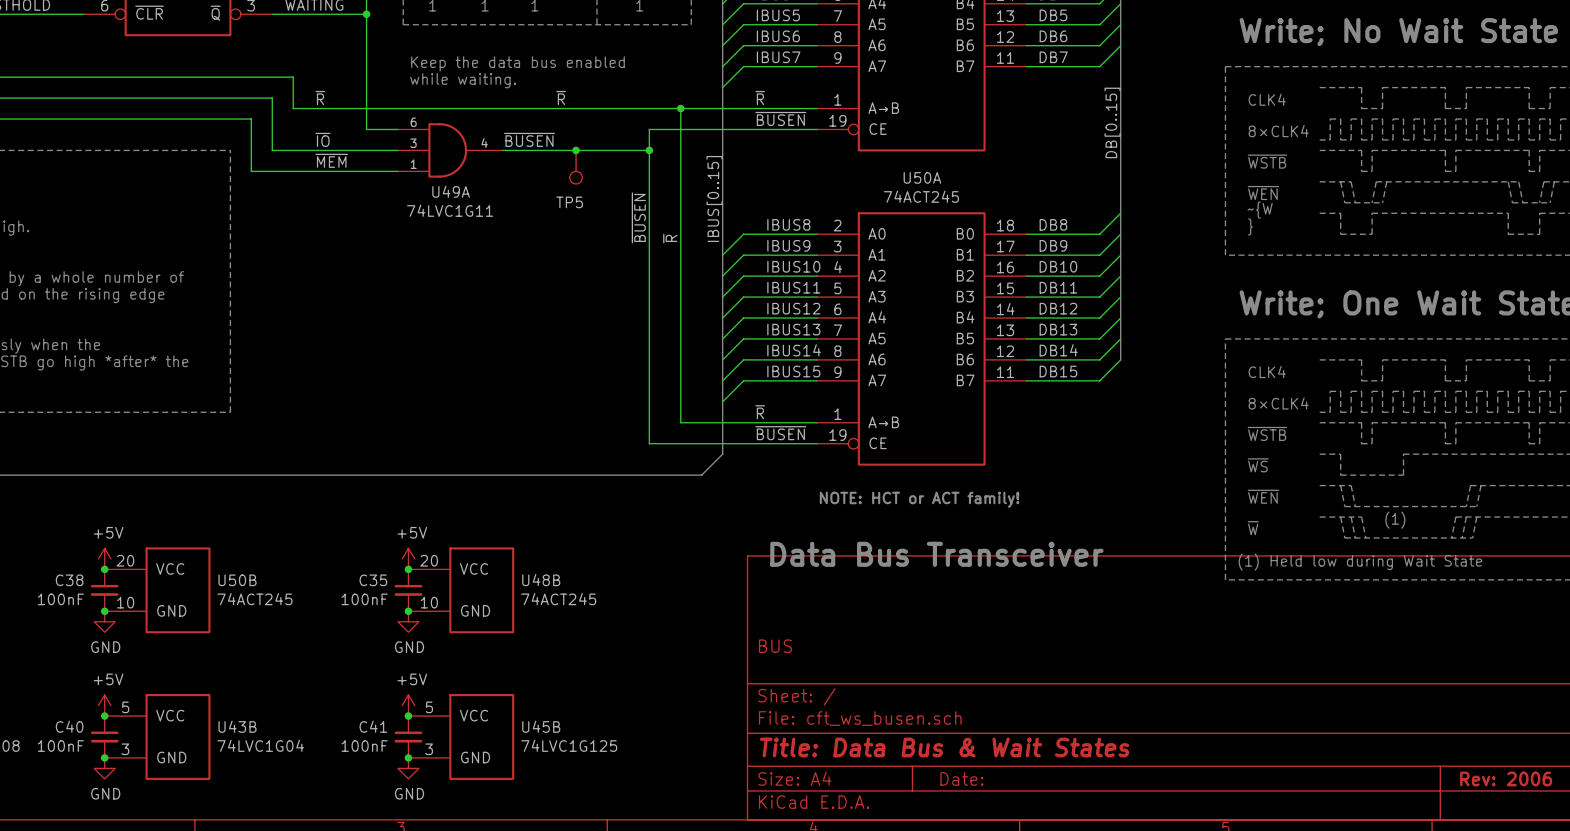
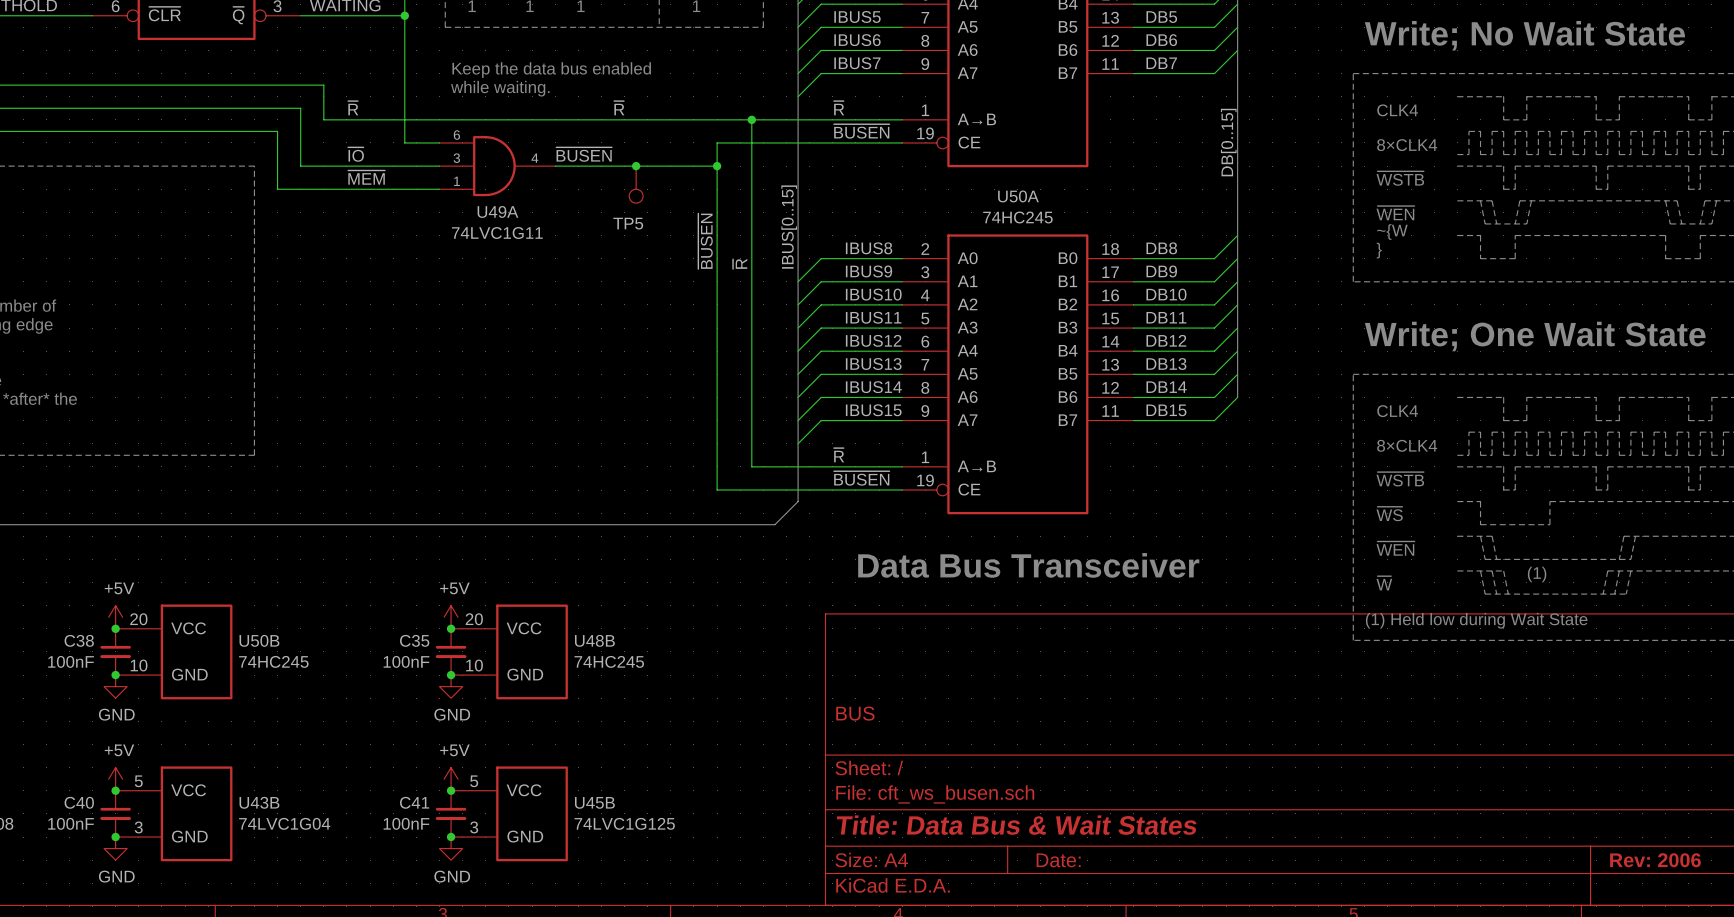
U50A value: 74ACT245 (921, 196) -> 74HC245 (1017, 217)
text: NOTE: HCT or ACT family! (919, 499) -> none
text position: Data Bus Transceiver (936, 554) -> Data Bus Transceiver (1028, 565)
U50B value: 74ACT245 (254, 599) -> 74HC245 (273, 661)
U48B value: 74ACT245 (558, 599) -> 74HC245 (609, 661)

